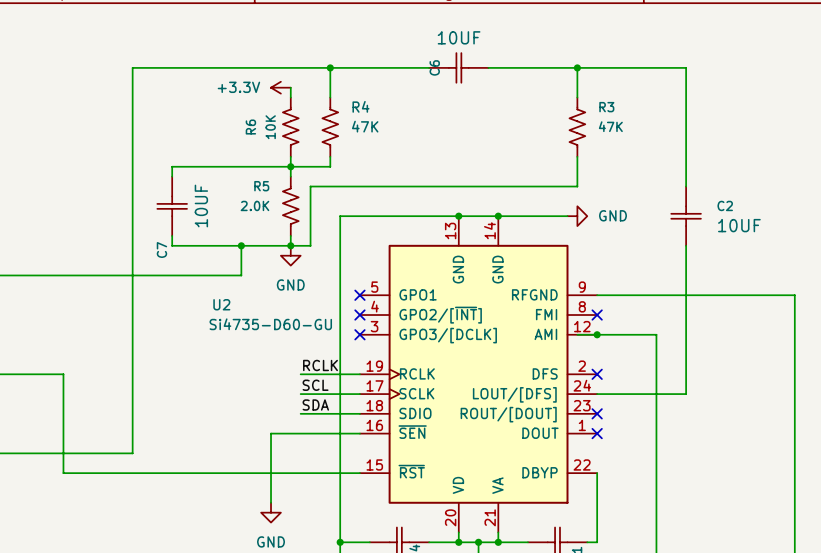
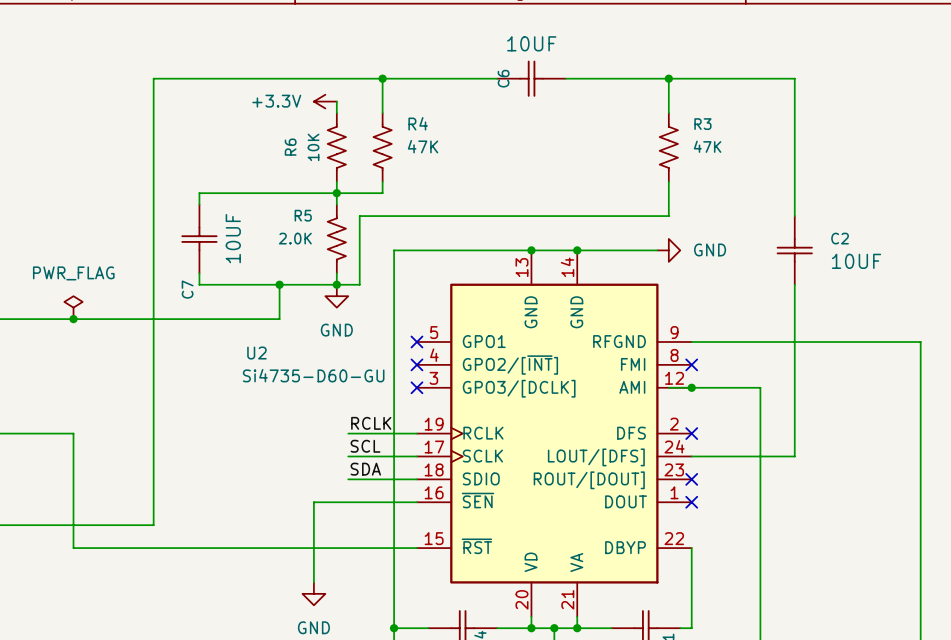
power symbol: none -> PWR_FLAG (73, 307)
junction: none -> (73, 319)

